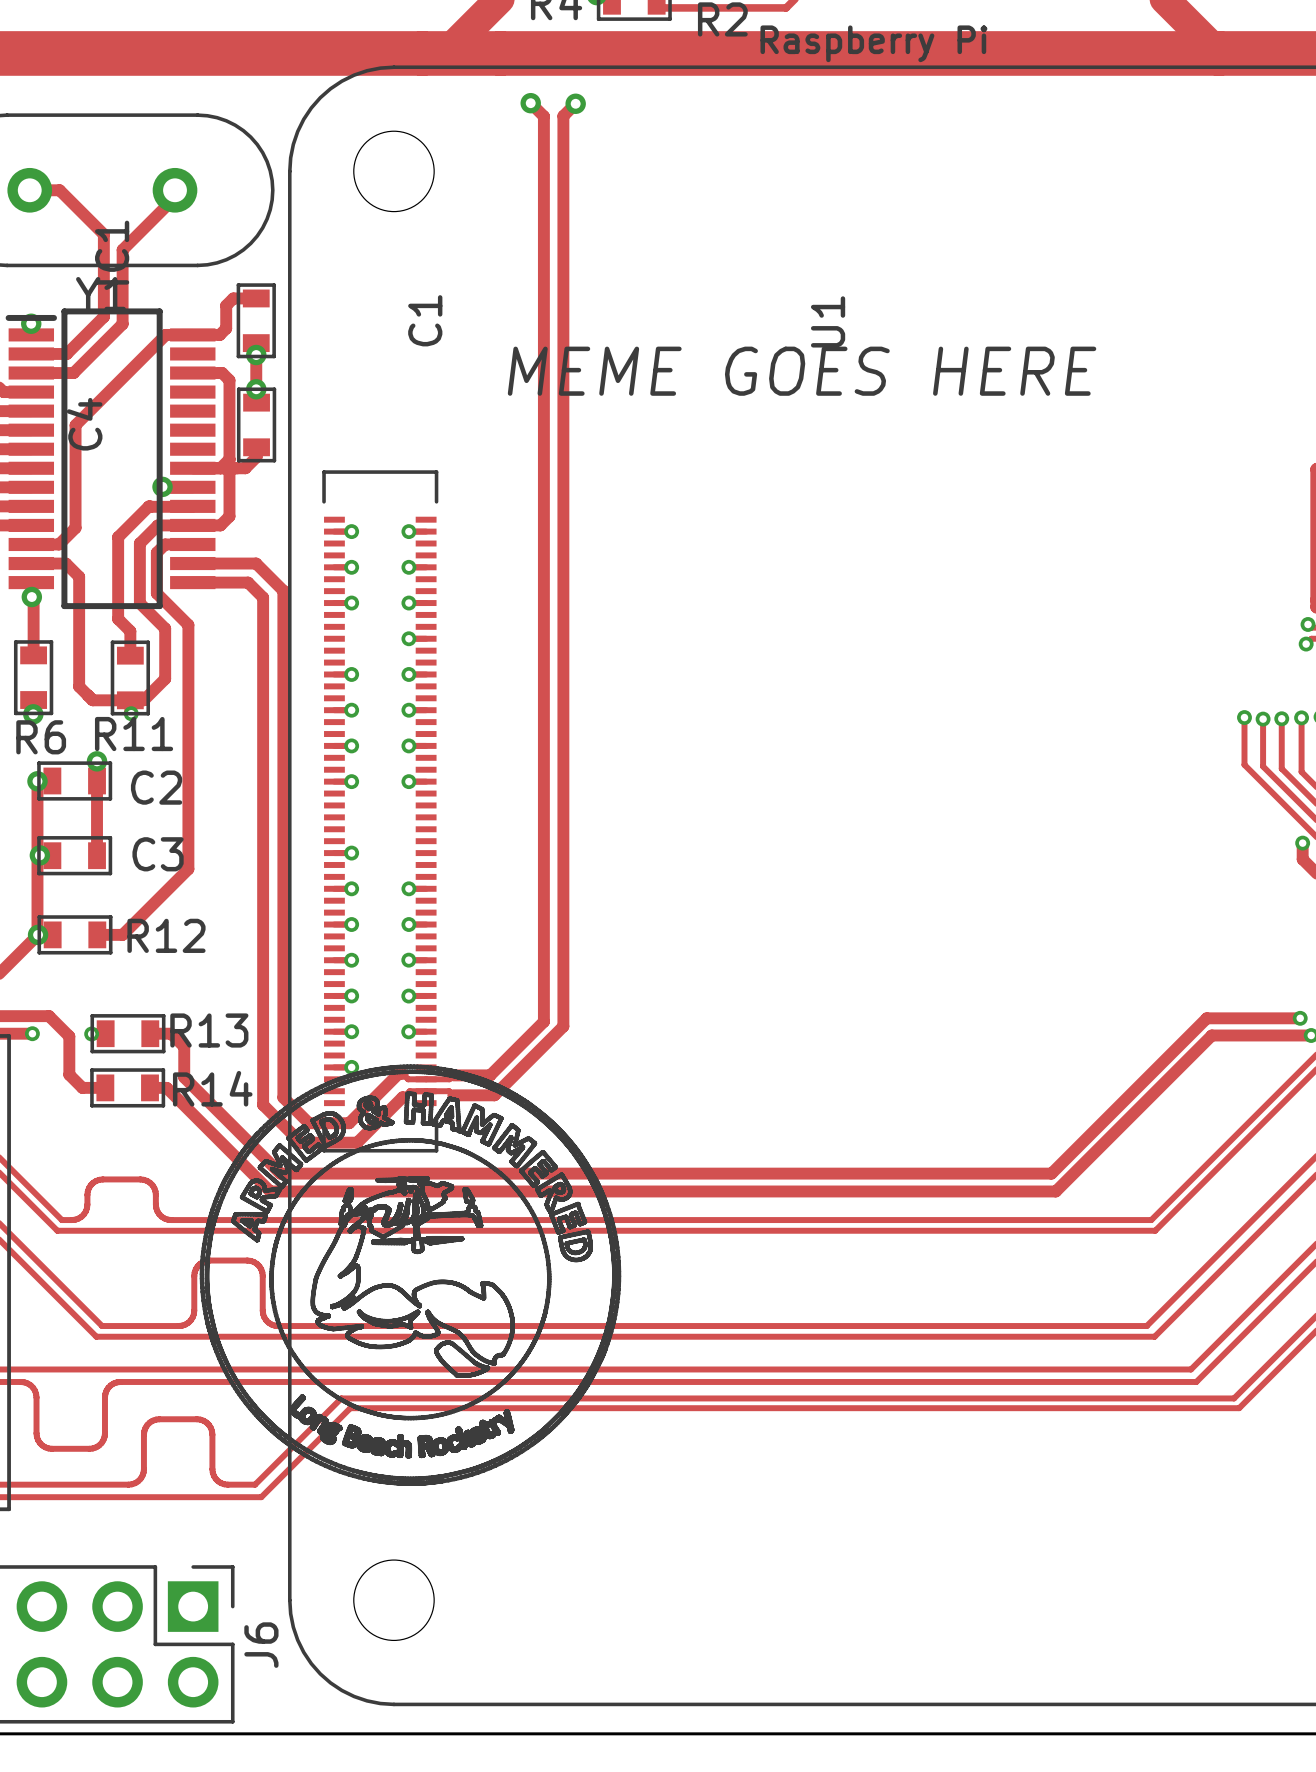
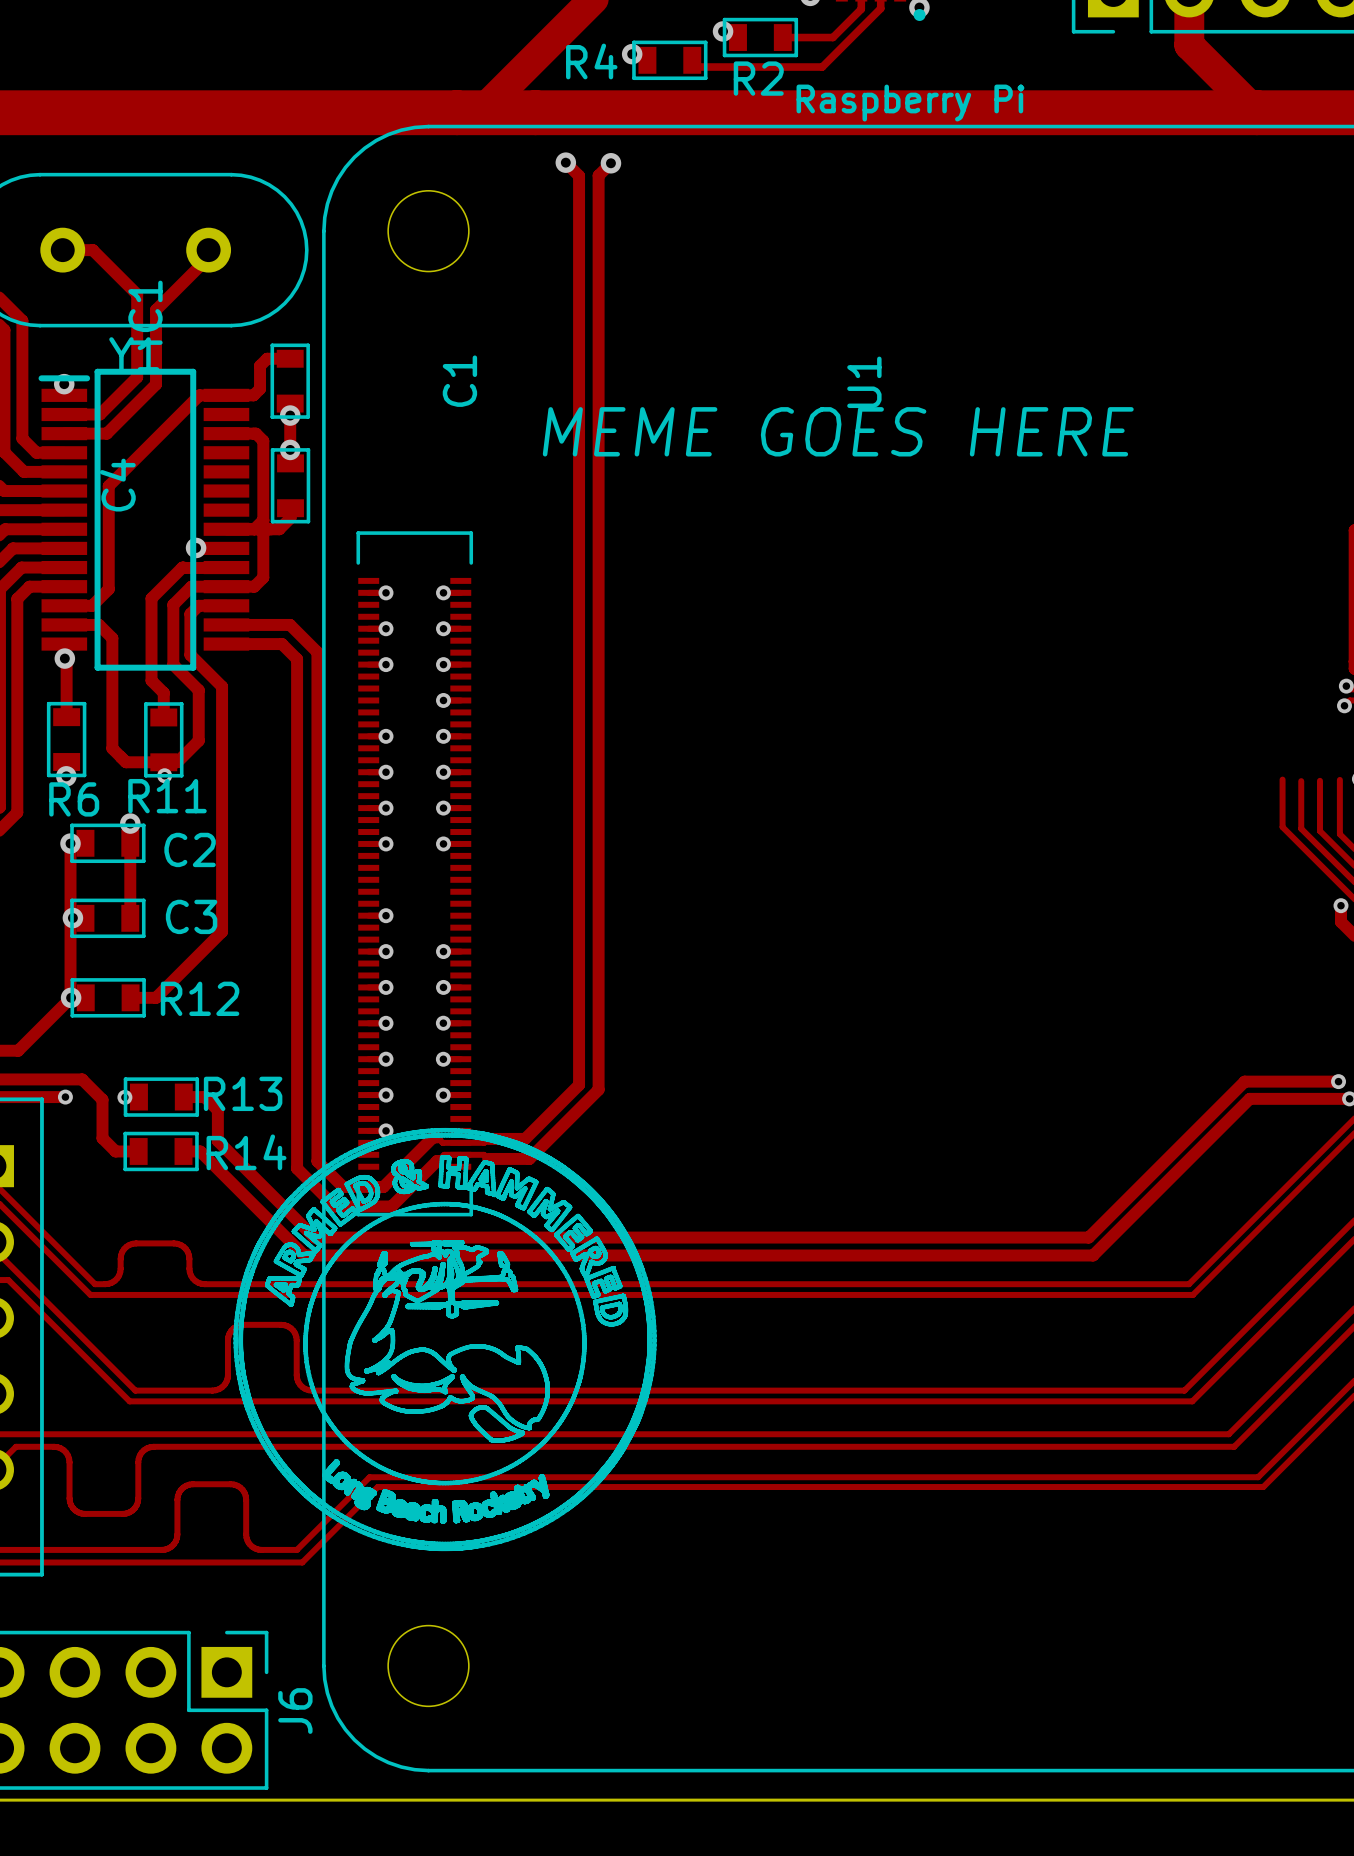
via: (1244, 717) -> none
via: (1301, 717) -> none
via: (1281, 718) -> none
via: (1263, 719) -> none
track: (1234, 1398) (341, 1398) (255, 1484) -> (1272, 1463) (1258, 1477) (369, 1477) (296, 1549) (289, 1549)
track: (1239, 1408) (350, 1408) (261, 1497) -> (1277, 1473) (1263, 1487) (377, 1487) (302, 1562) (295, 1562)

